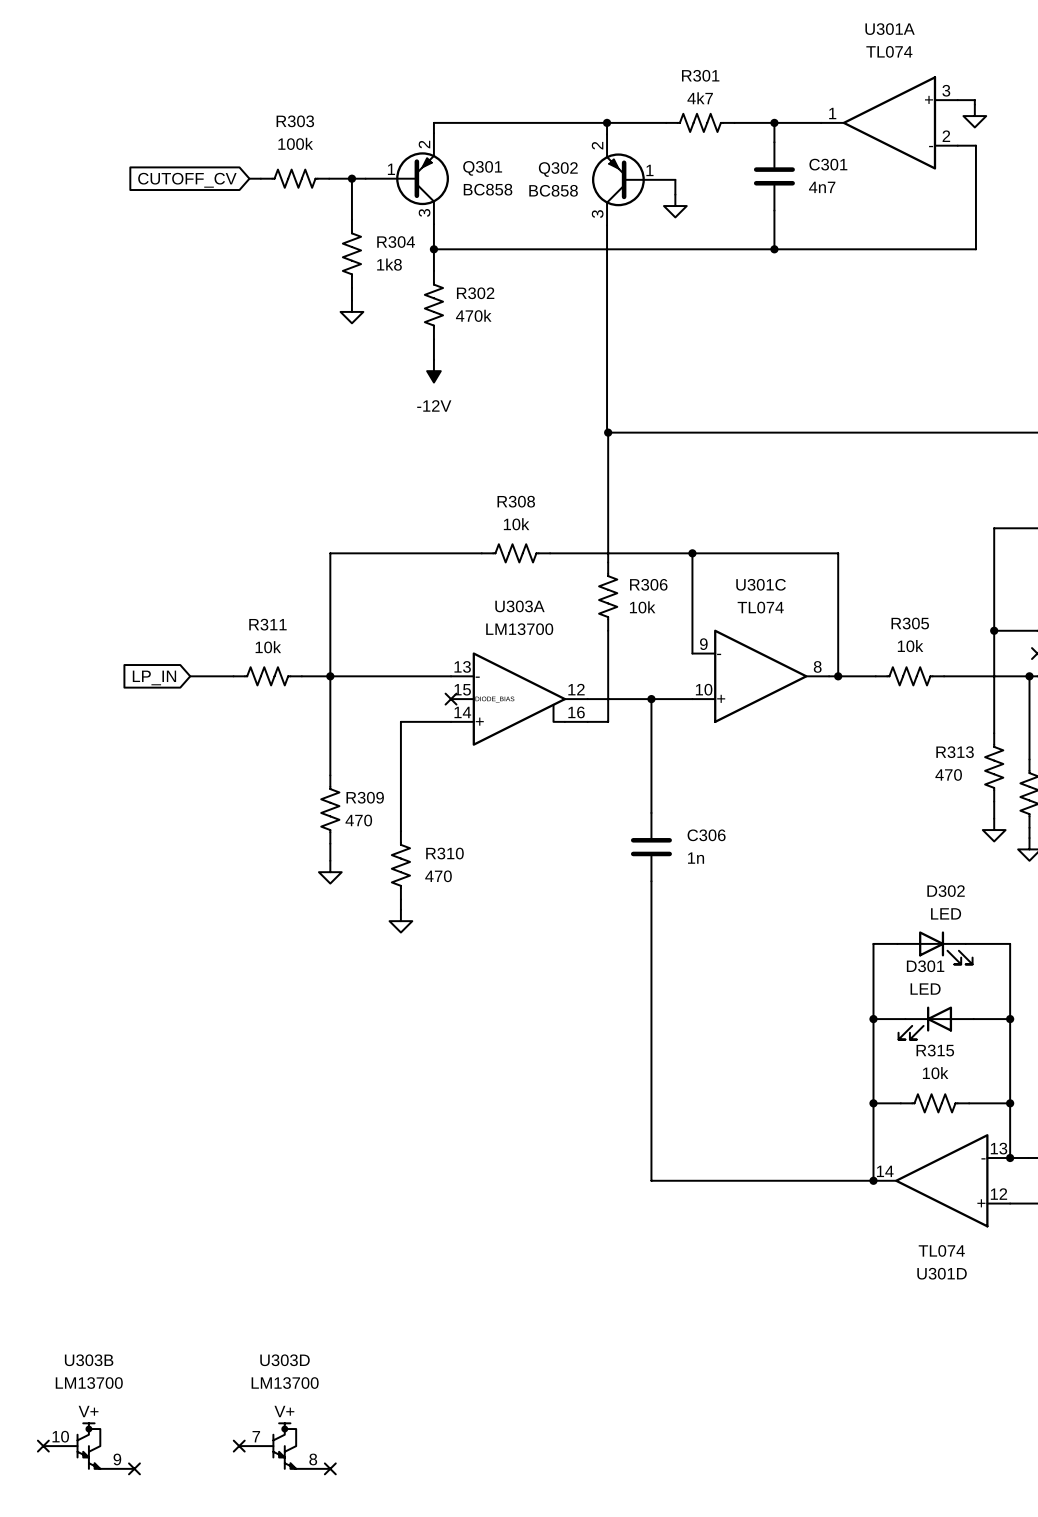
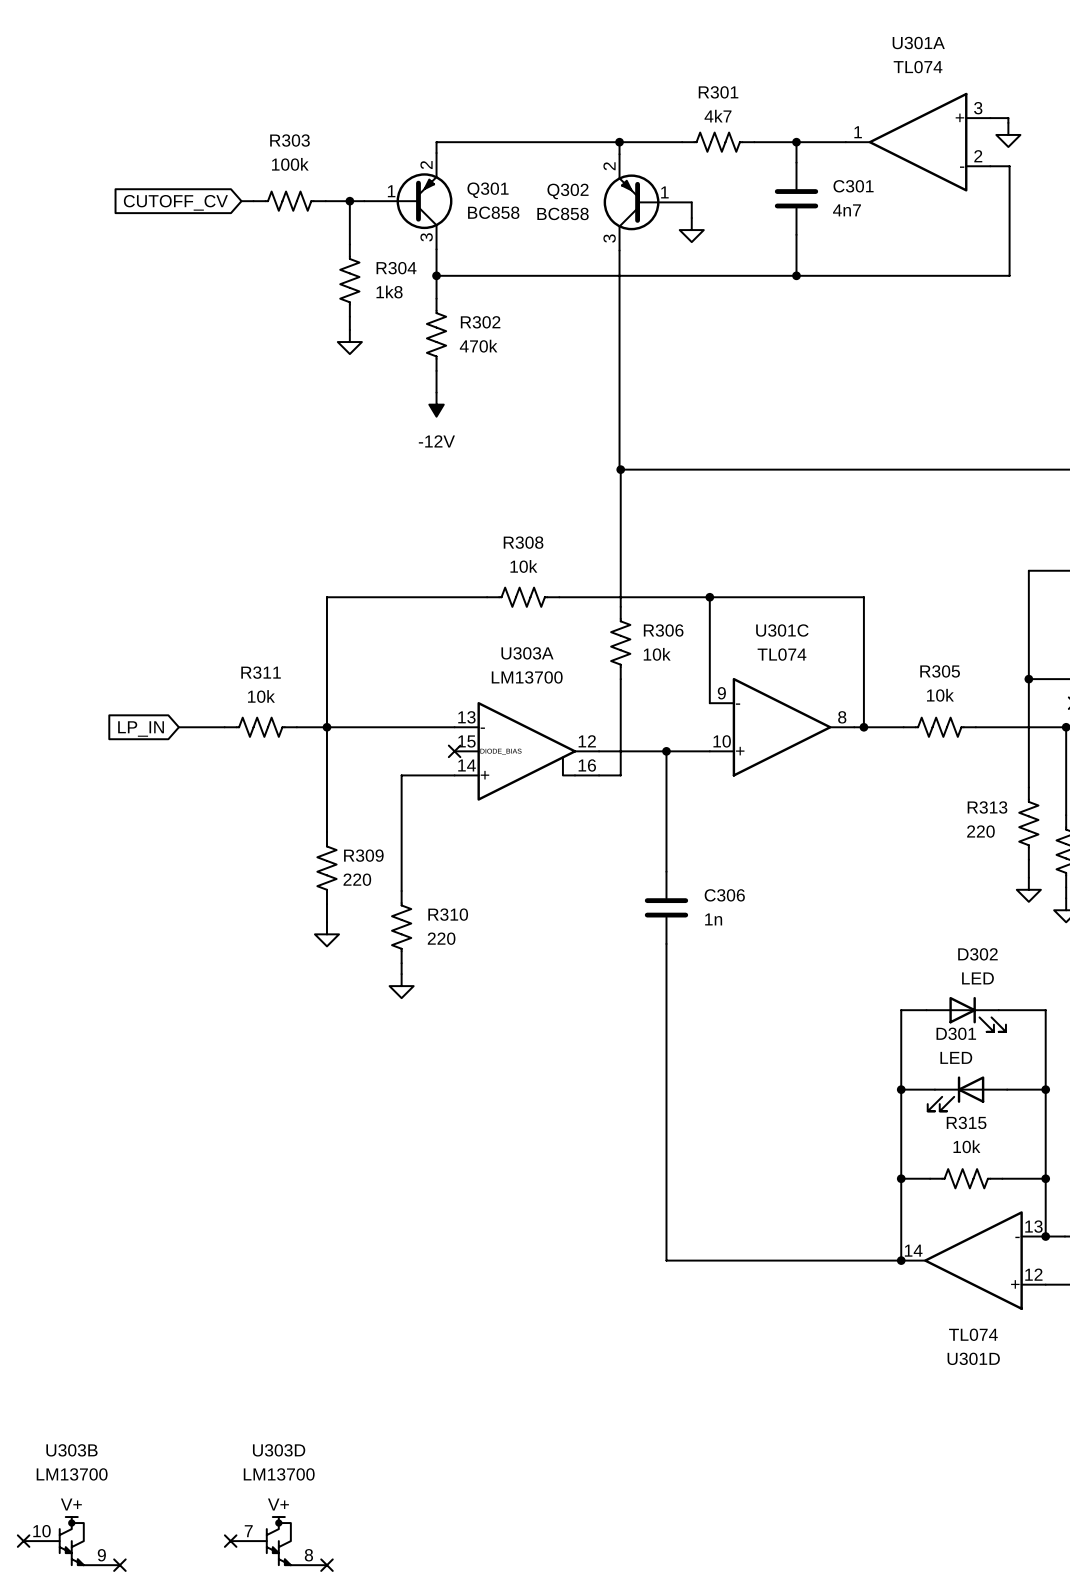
R313 value: 470 (948, 774) -> 220 (980, 831)
R309 value: 470 (358, 820) -> 220 (357, 879)
R310 value: 470 (438, 876) -> 220 (441, 938)

